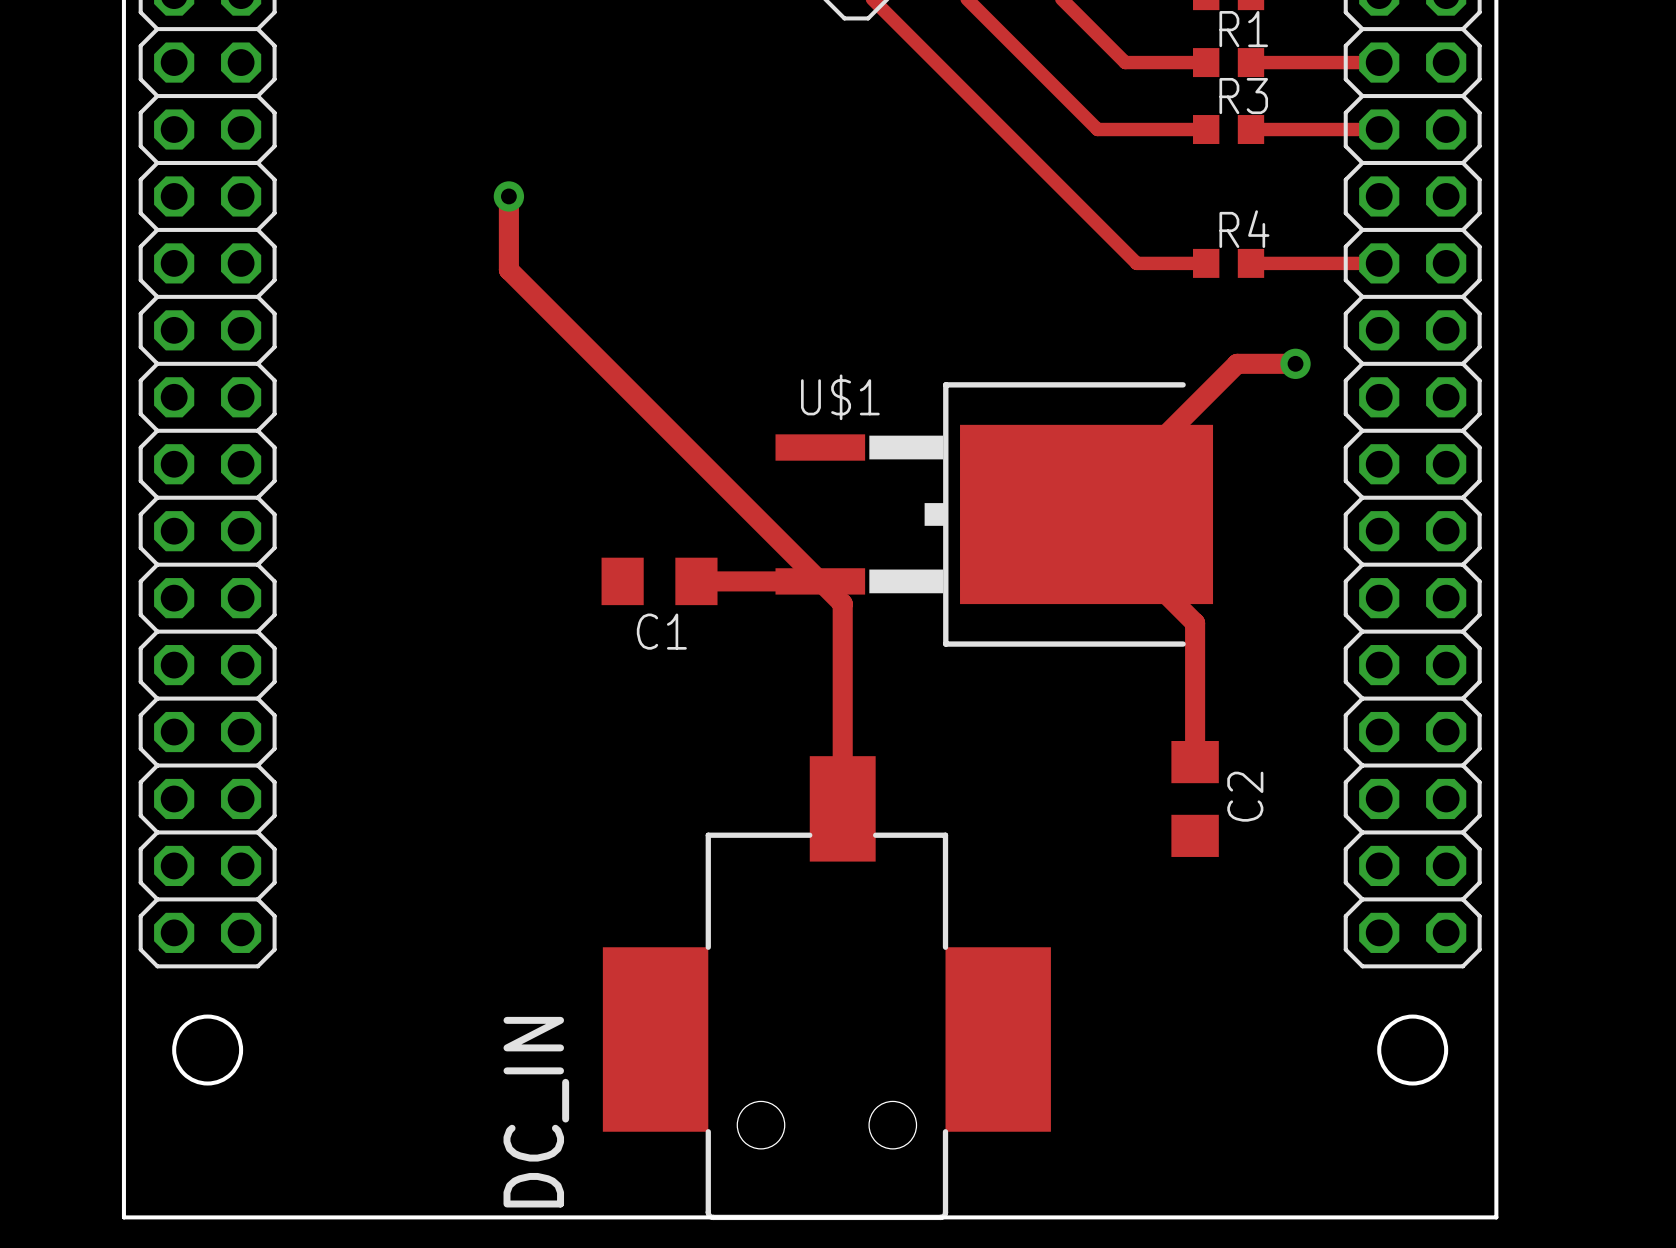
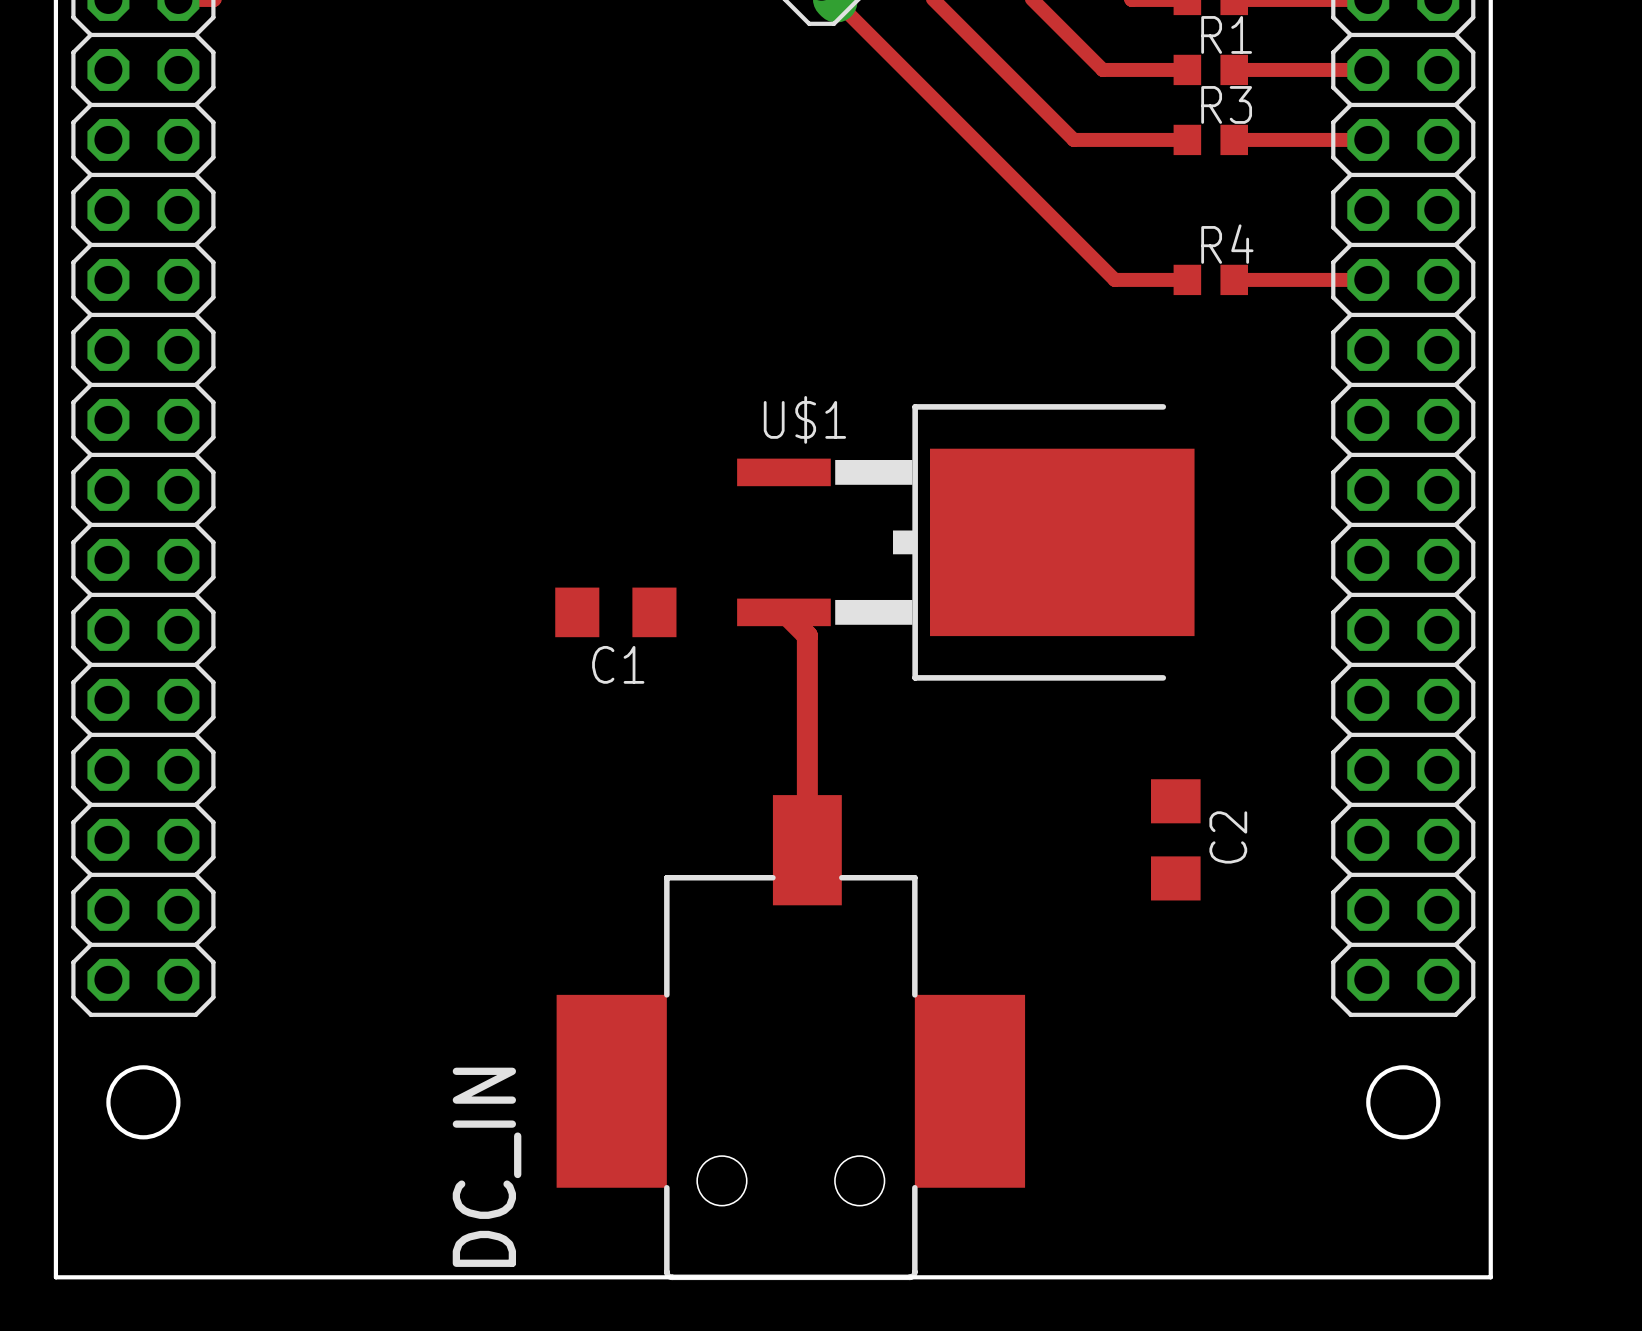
track: (508, 196) (508, 269) (820, 581) (696, 581) -> none
via: (508, 196) -> none
track: (1295, 363) (1237, 363) (1086, 514) (1195, 623) (1195, 762) -> none
via: (1295, 363) -> none

